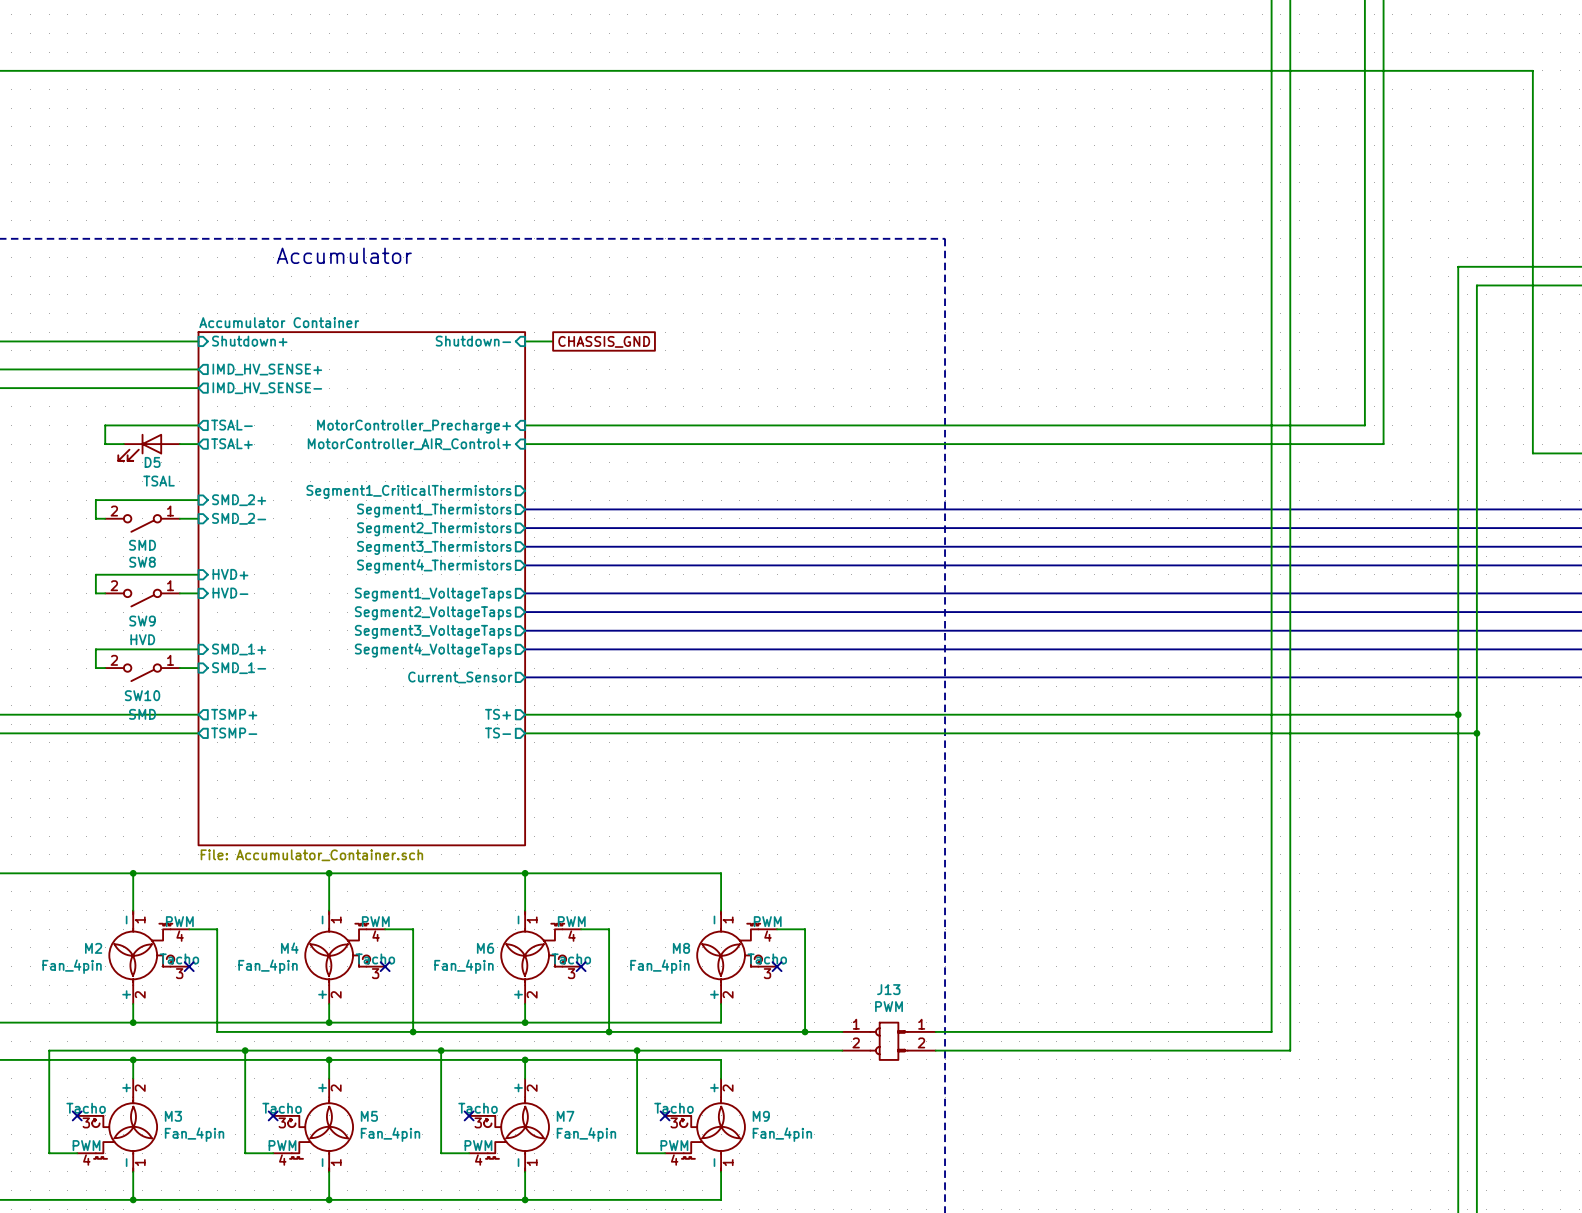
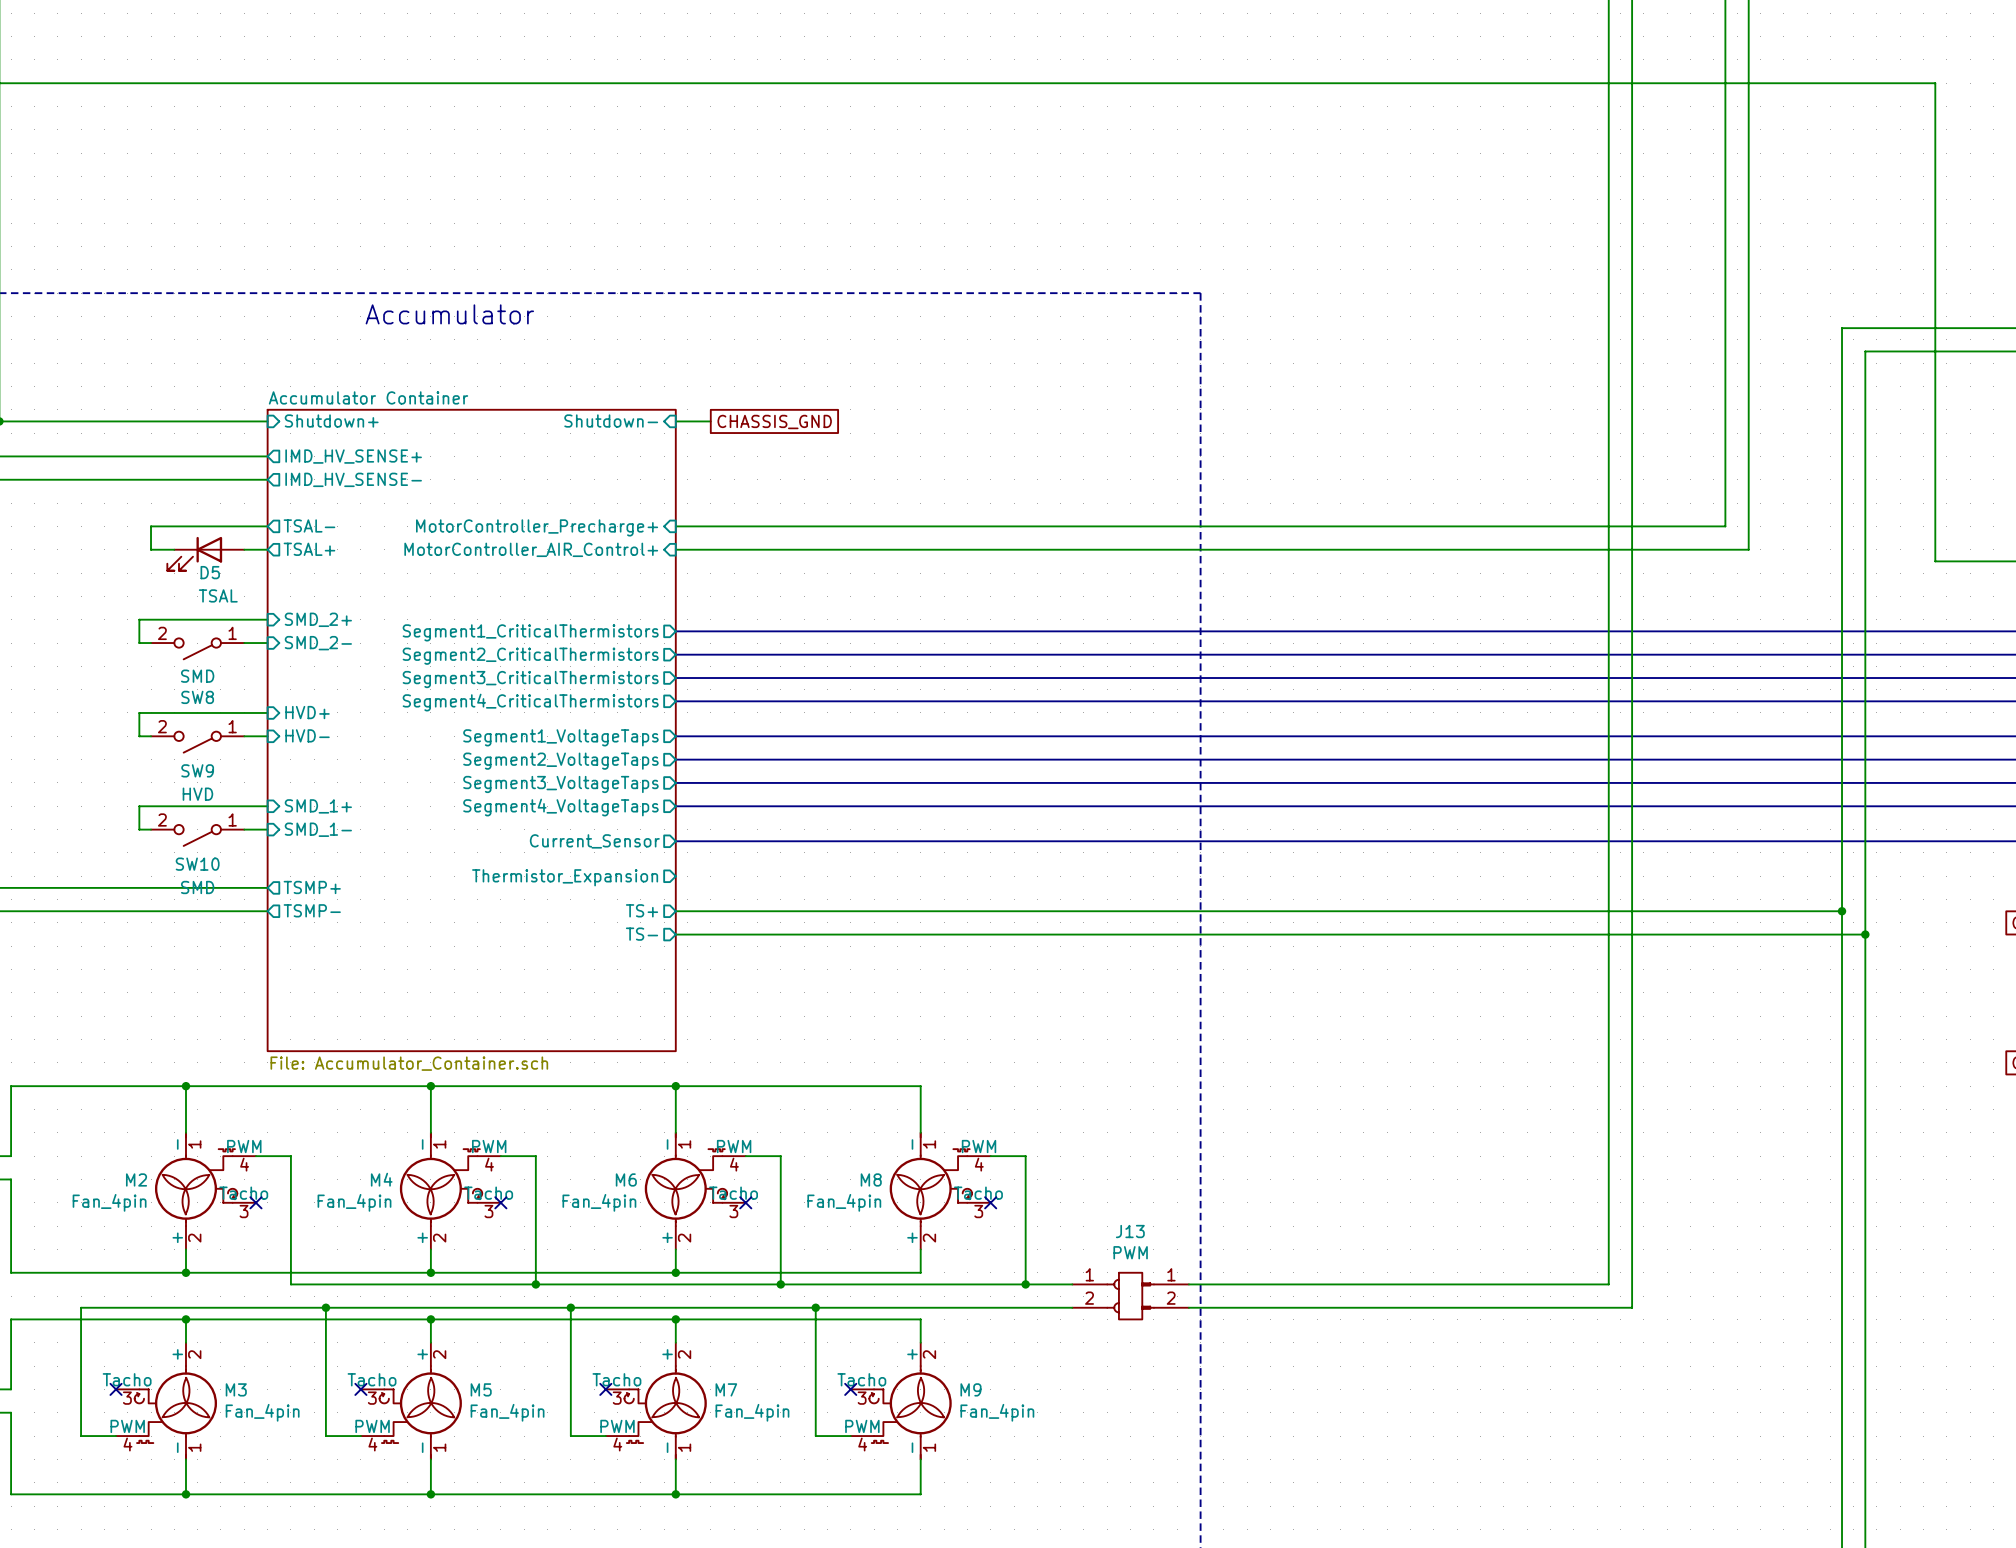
sheet pin: Segment1_CriticalThermistors (408, 491) -> none
sheet pin: Segment1_Thermistors (434, 510) -> Segment1_CriticalThermistors (530, 632)
sheet pin: Segment2_Thermistors (434, 529) -> Segment2_CriticalThermistors (530, 656)
sheet pin: Segment3_Thermistors (434, 547) -> Segment3_CriticalThermistors (530, 679)
sheet pin: Segment4_Thermistors (434, 566) -> Segment4_CriticalThermistors (530, 702)
sheet pin: none -> Thermistor_Expansion (565, 877)
sheet pin: TS+ (498, 714) -> none
wire: (525, 714) (1458, 714) -> none
junction: (1458, 714) -> none
sheet pin: TS- (498, 733) -> TS+ (642, 910)
wire: (1458, 733) (1476, 733) -> none
junction: none -> (1842, 911)
junction: (1476, 733) -> none
sheet pin: none -> TS- (642, 934)
wire: none -> (675, 934) (1865, 934)
junction: none -> (1865, 934)

